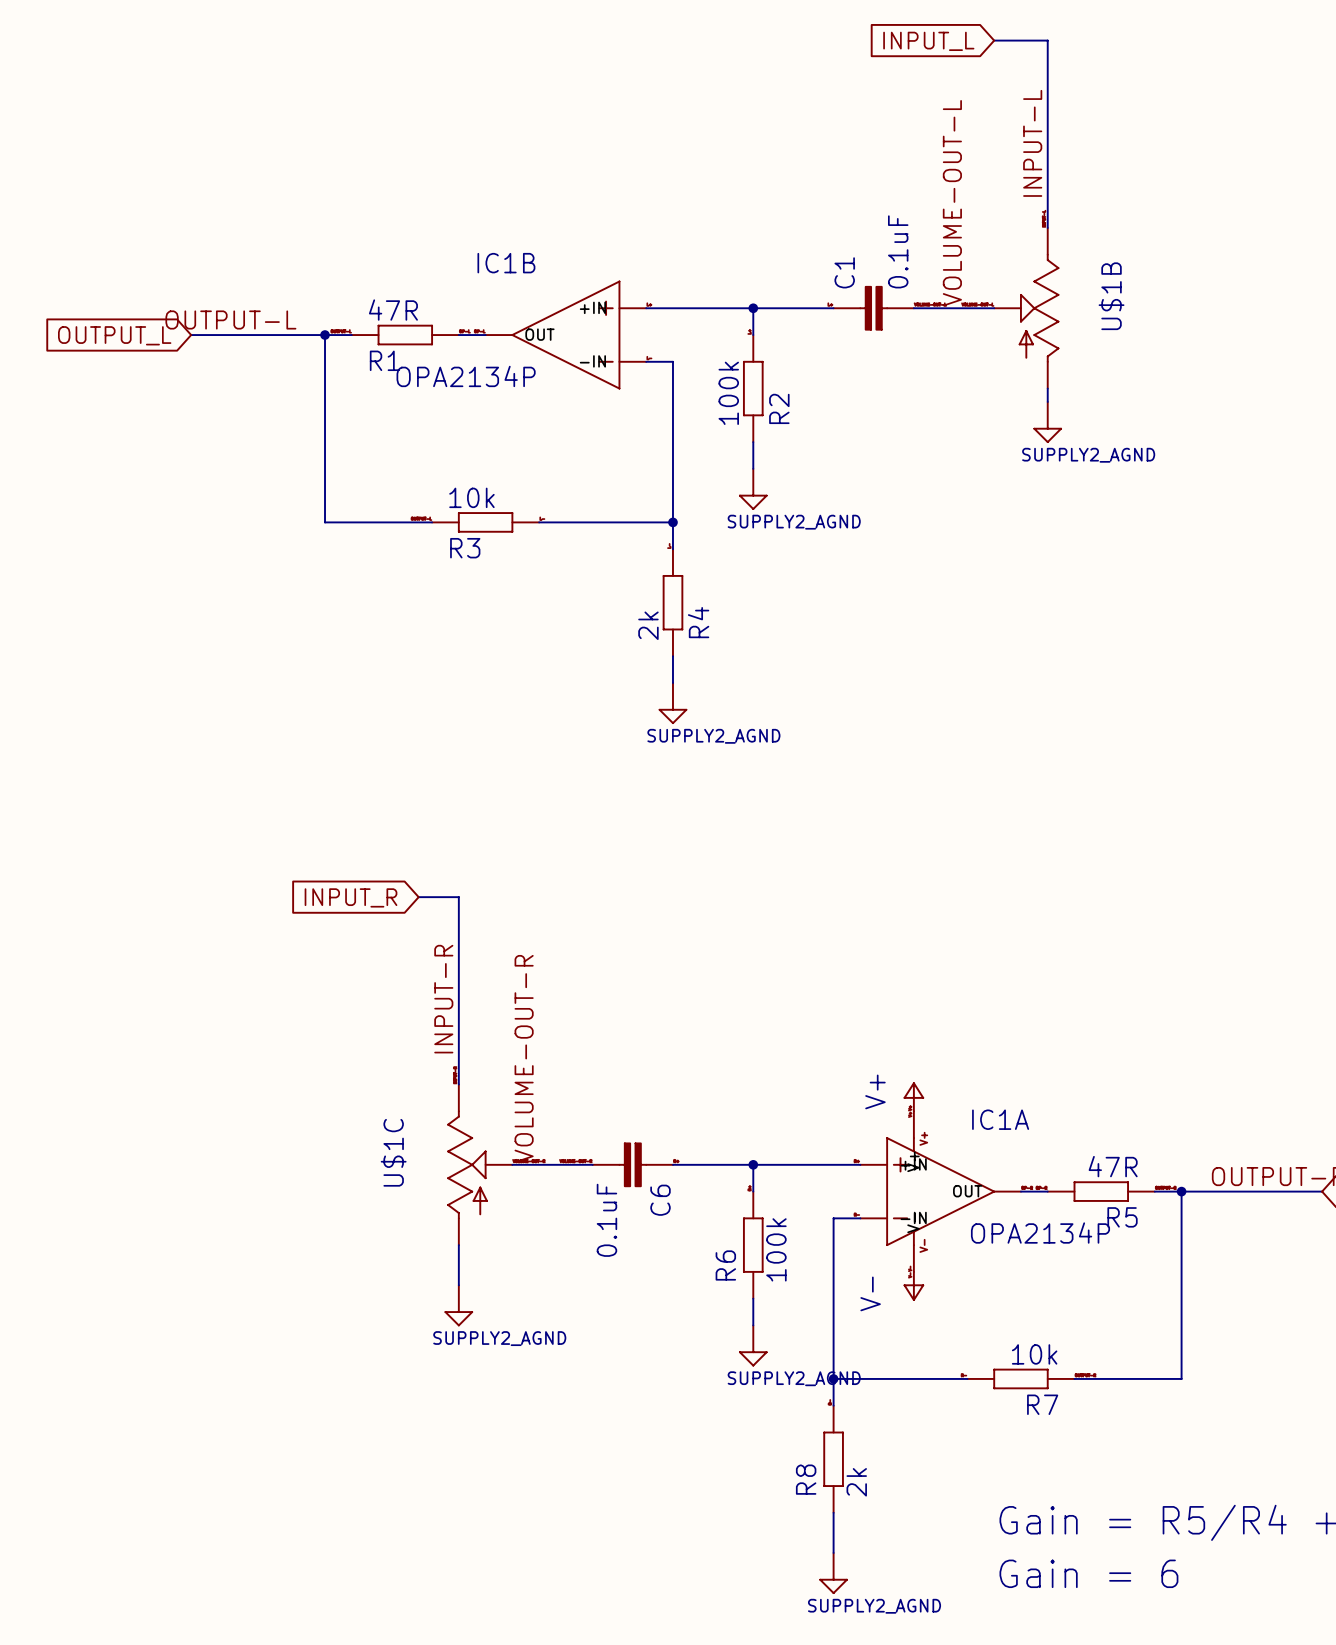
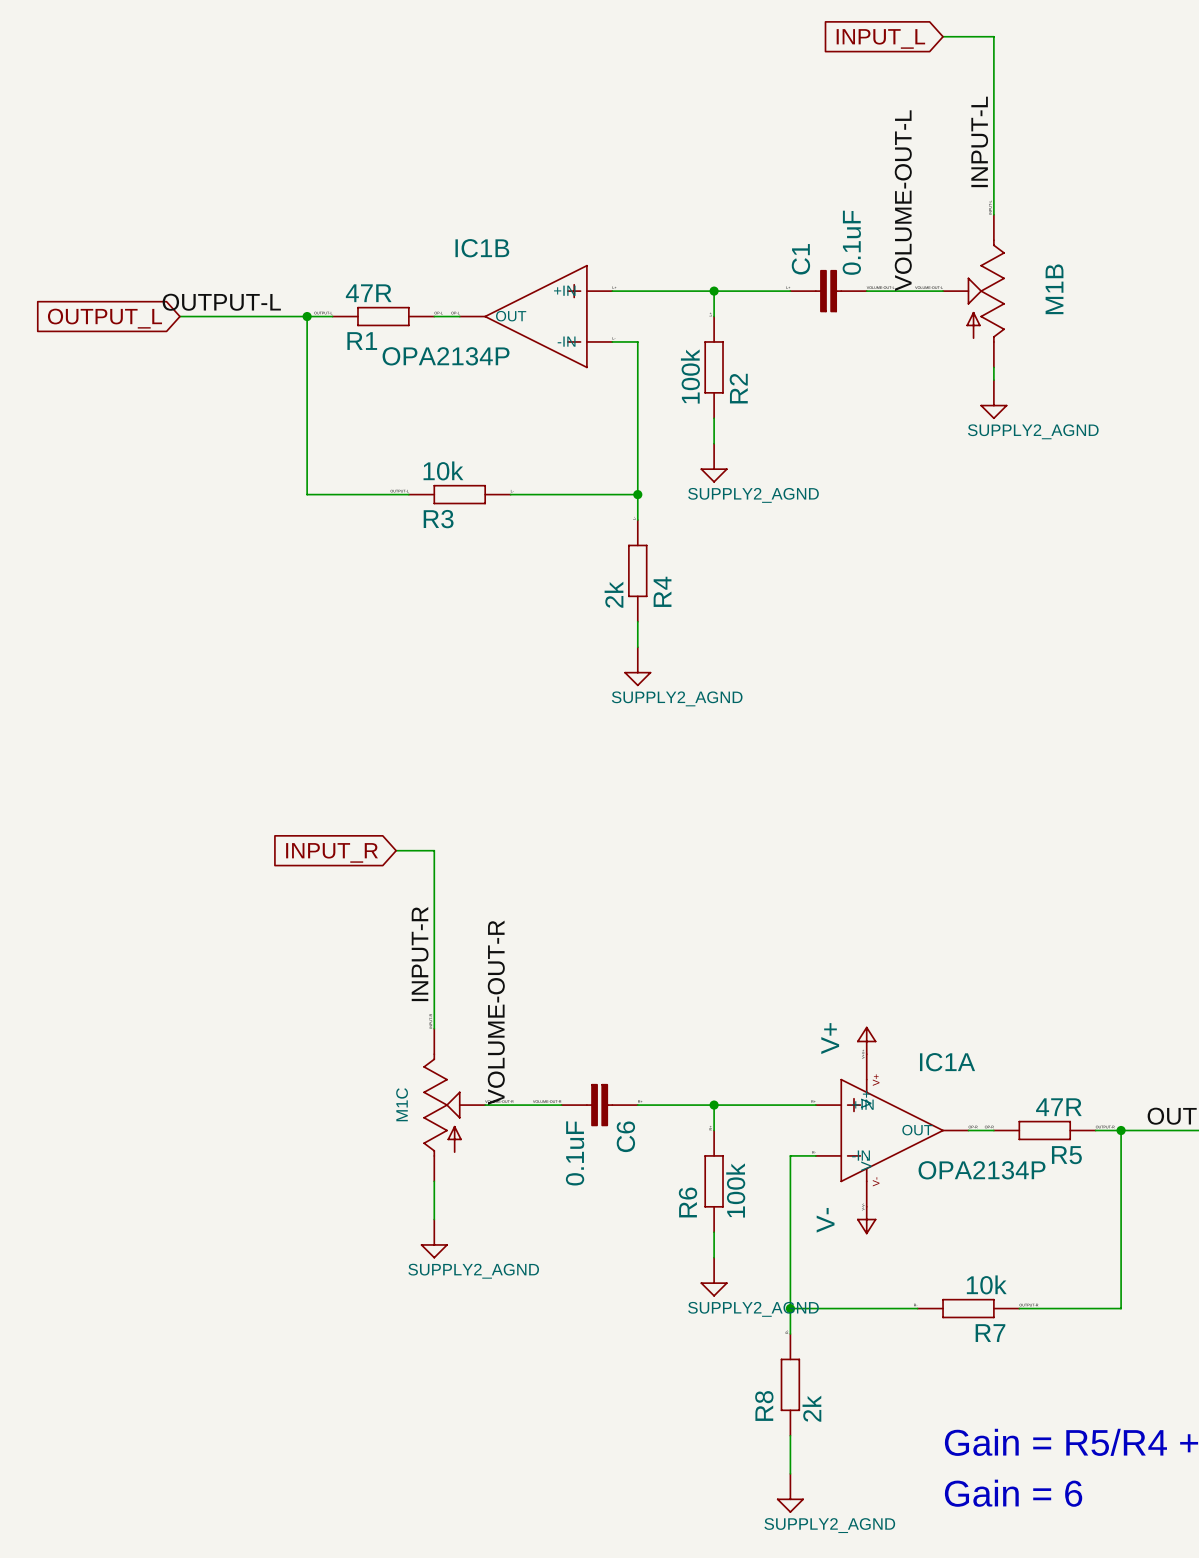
U$1B name: U$1B (1111, 296) -> M1B (1054, 289)
U$1C name: U$1C (393, 1152) -> M1C (402, 1104)

